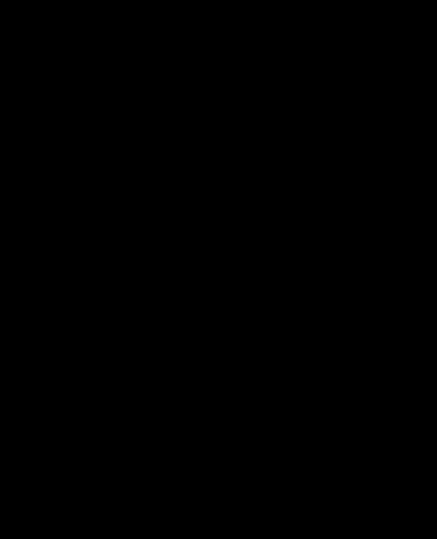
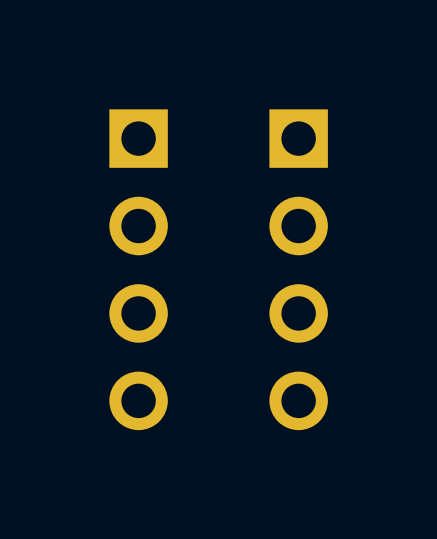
part: none -> (138, 269)
part: none -> (298, 269)

